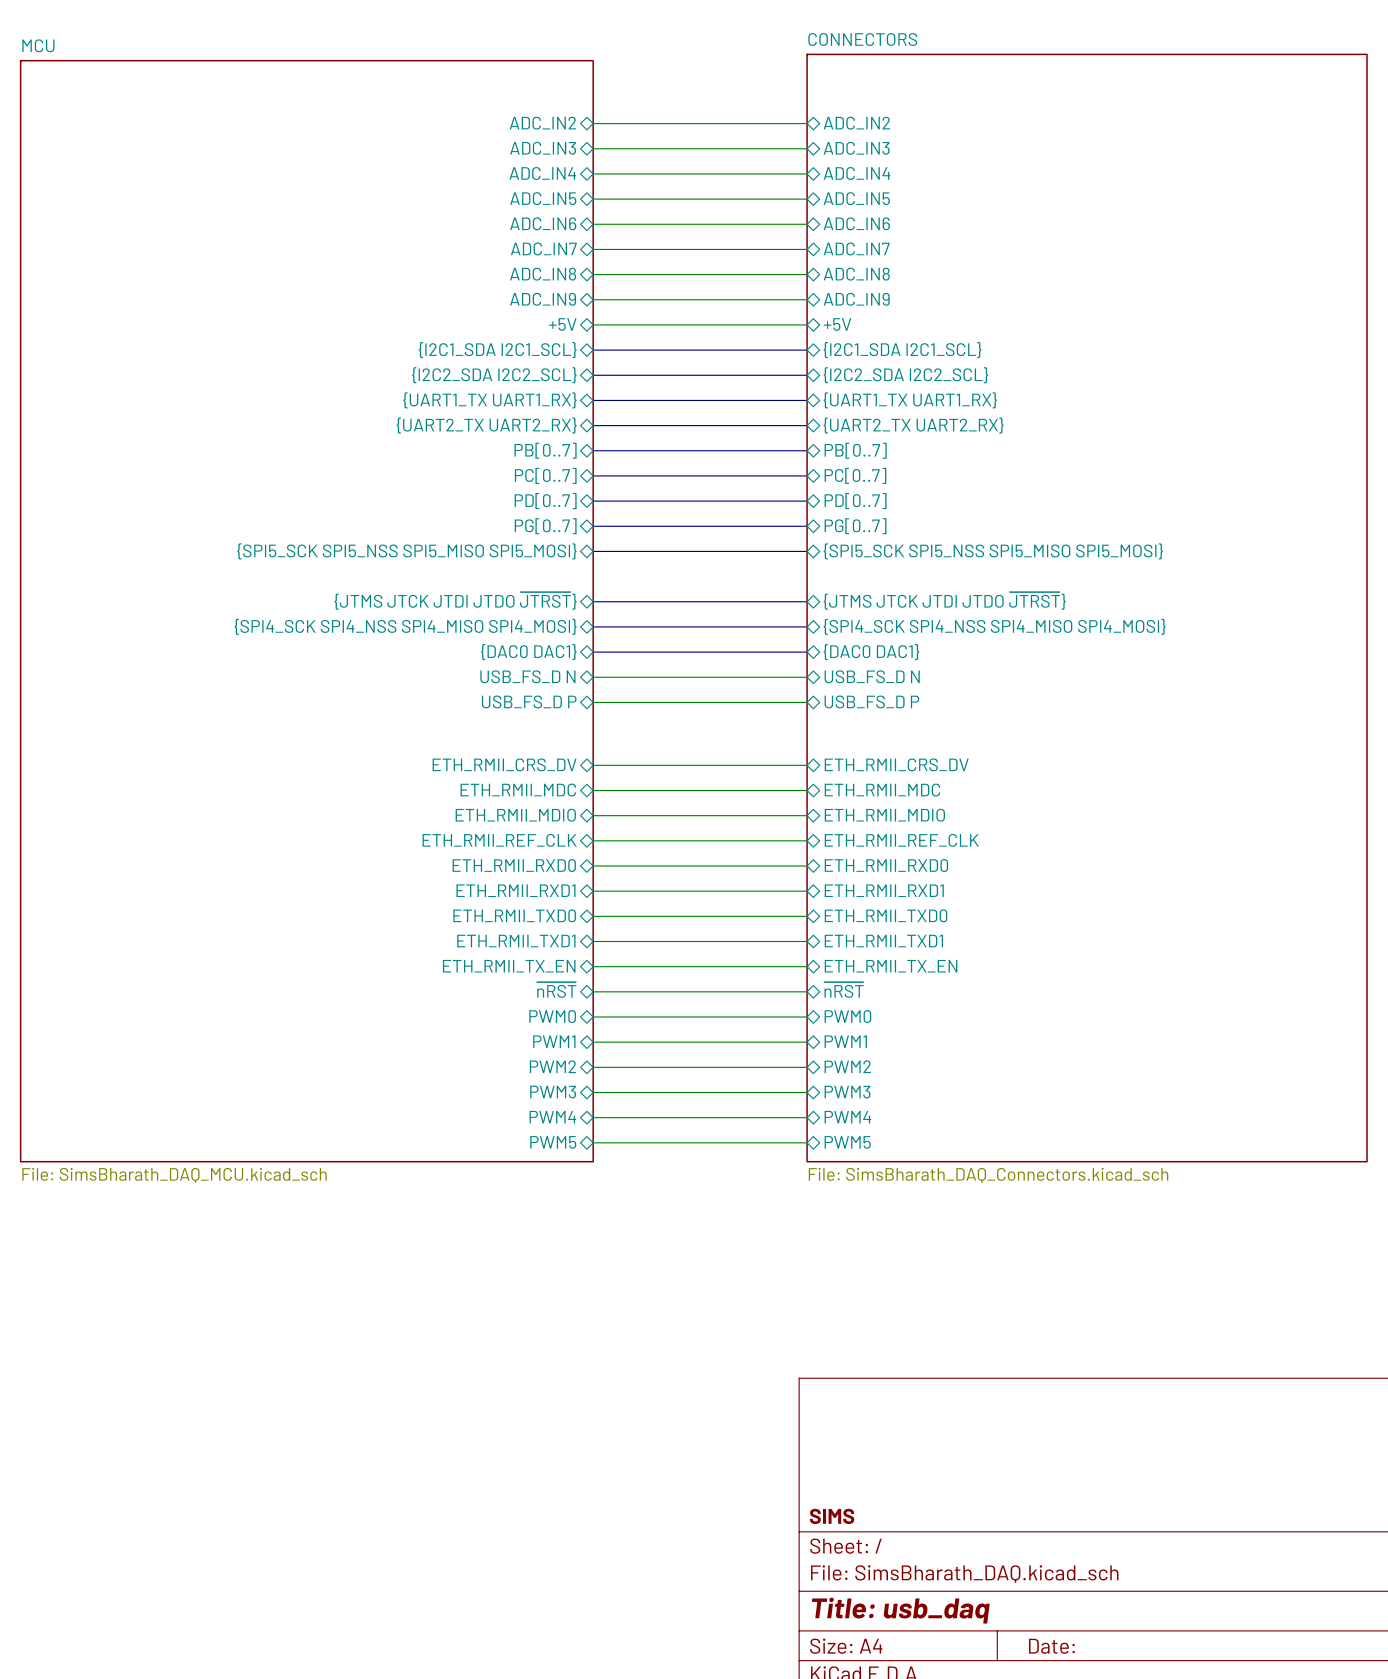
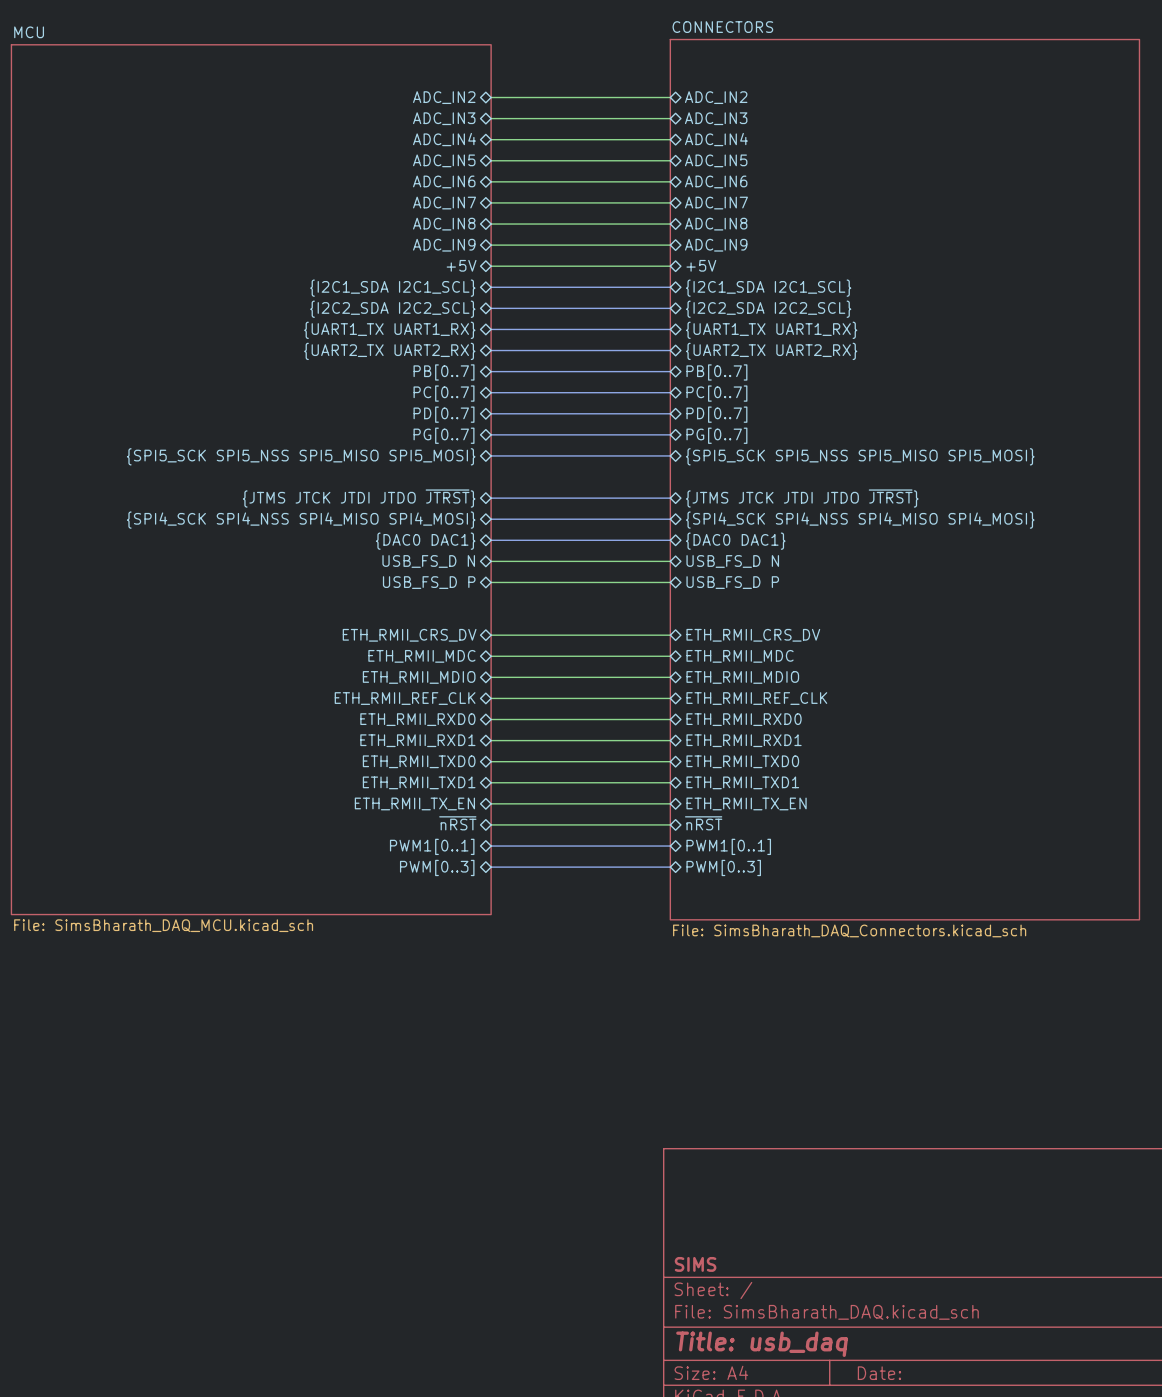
sheet MCU: none -> File: SimsBharath_DAQ_MCU.kicad_sch (251, 479)
sheet CONNECTORS: none -> File: SimsBharath_DAQ_Connectors.kicad_sch (904, 479)
sheet CONNECTORS: File: SimsBharath_DAQ_Connectors.kicad_sch (1087, 608) -> none
sheet MCU: File: SimsBharath_DAQ_MCU.kicad_sch (306, 611) -> none
sheet pin: PWM0 (552, 1016) -> PWM1[0..1] (432, 846)
sheet pin: PWM0 (847, 1016) -> PWM1[0..1] (728, 846)
bus: none -> (491, 846) (670, 846)
sheet pin: PWM1 (554, 1041) -> PWM[0..3] (437, 867)
sheet pin: PWM1 (845, 1041) -> PWM[0..3] (723, 867)
bus: none -> (491, 867) (670, 867)
sheet pin: PWM2 (552, 1066) -> none
sheet pin: PWM2 (847, 1066) -> none
wire: (593, 1067) (807, 1067) -> none
sheet pin: PWM3 (553, 1092) -> none
wire: (593, 1092) (807, 1092) -> none
sheet pin: PWM3 (847, 1092) -> none
sheet pin: PWM4 (552, 1117) -> none
wire: (593, 1117) (807, 1117) -> none
sheet pin: PWM4 (847, 1117) -> none
sheet pin: PWM5 (553, 1142) -> none
wire: (593, 1142) (807, 1142) -> none
sheet pin: PWM5 (847, 1142) -> none

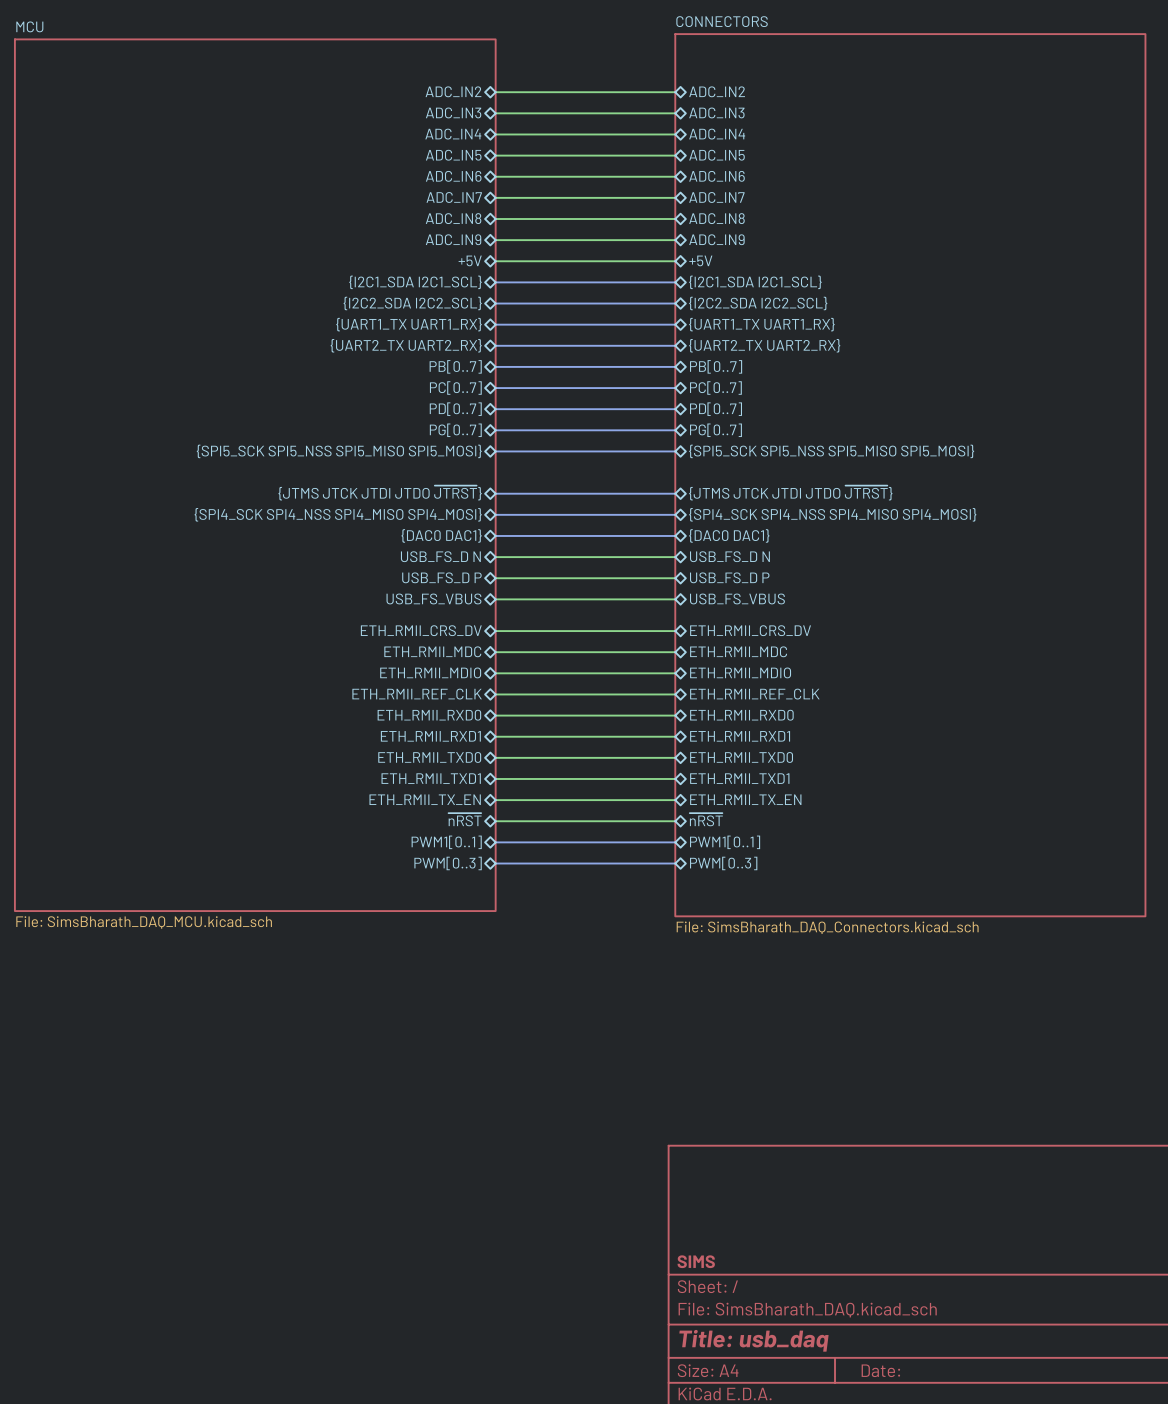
sheet pin: none -> USB_FS_VBUS (433, 598)
wire: none -> (495, 599) (675, 599)
sheet pin: none -> USB_FS_VBUS (737, 598)

